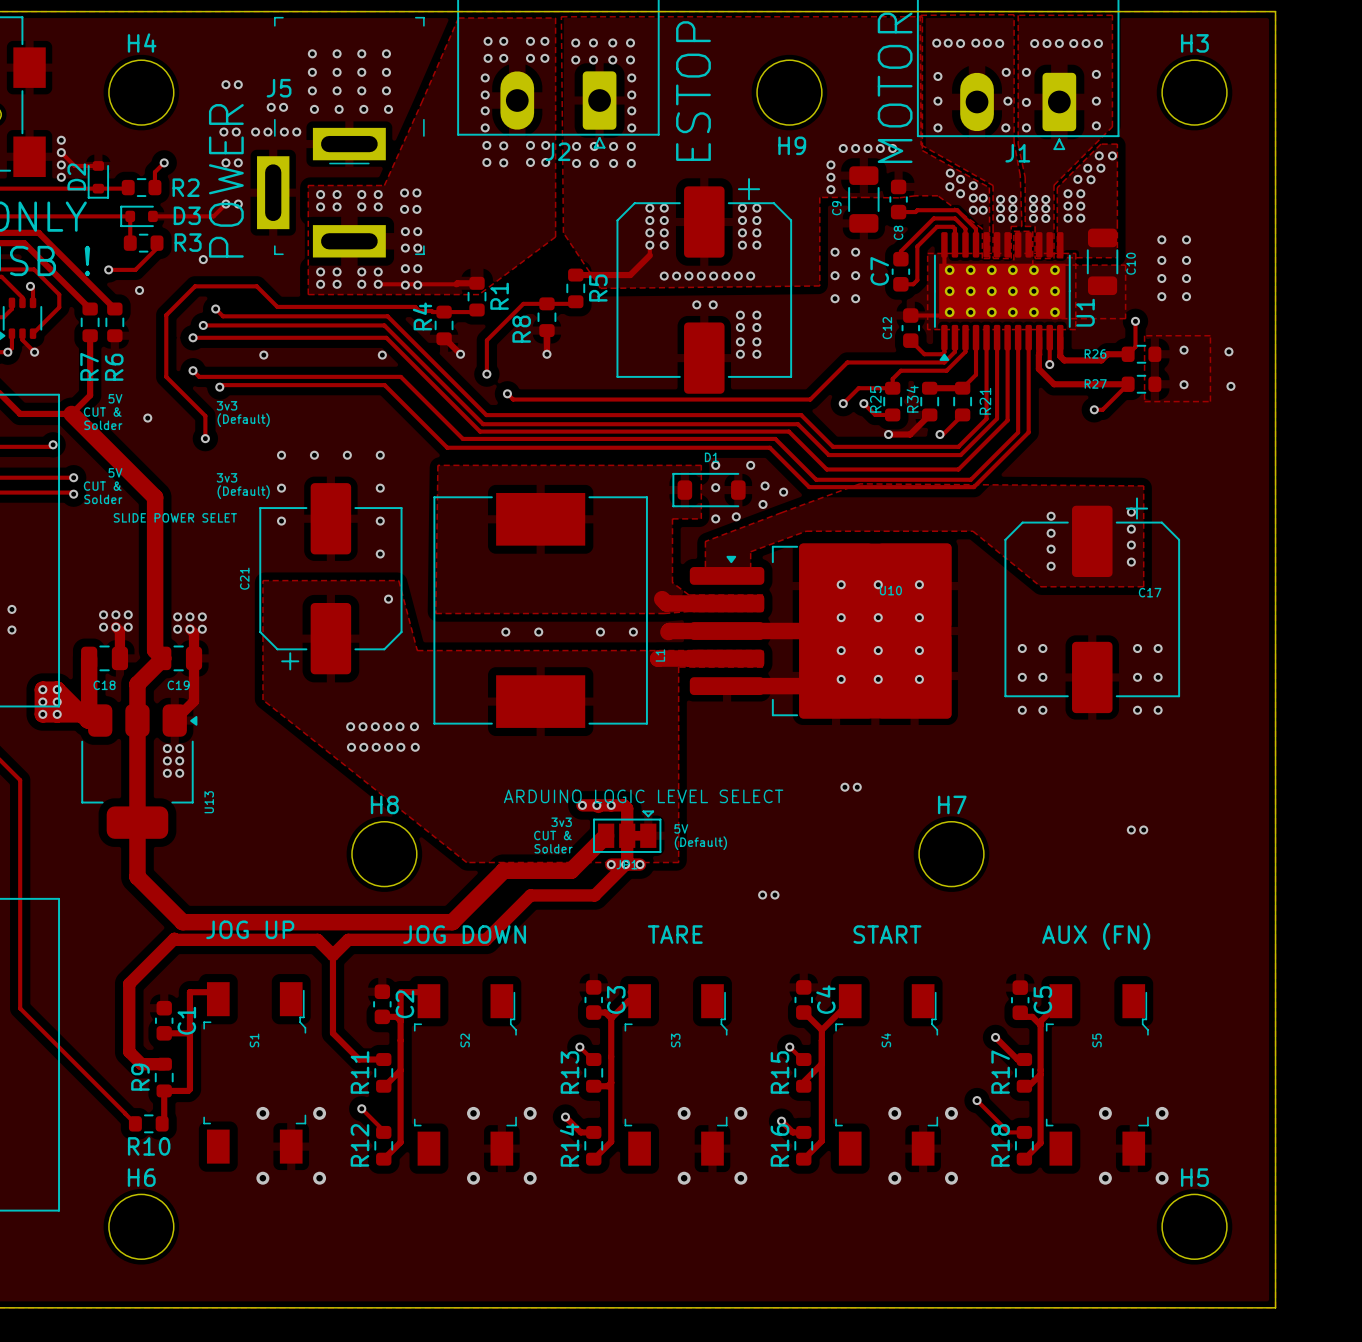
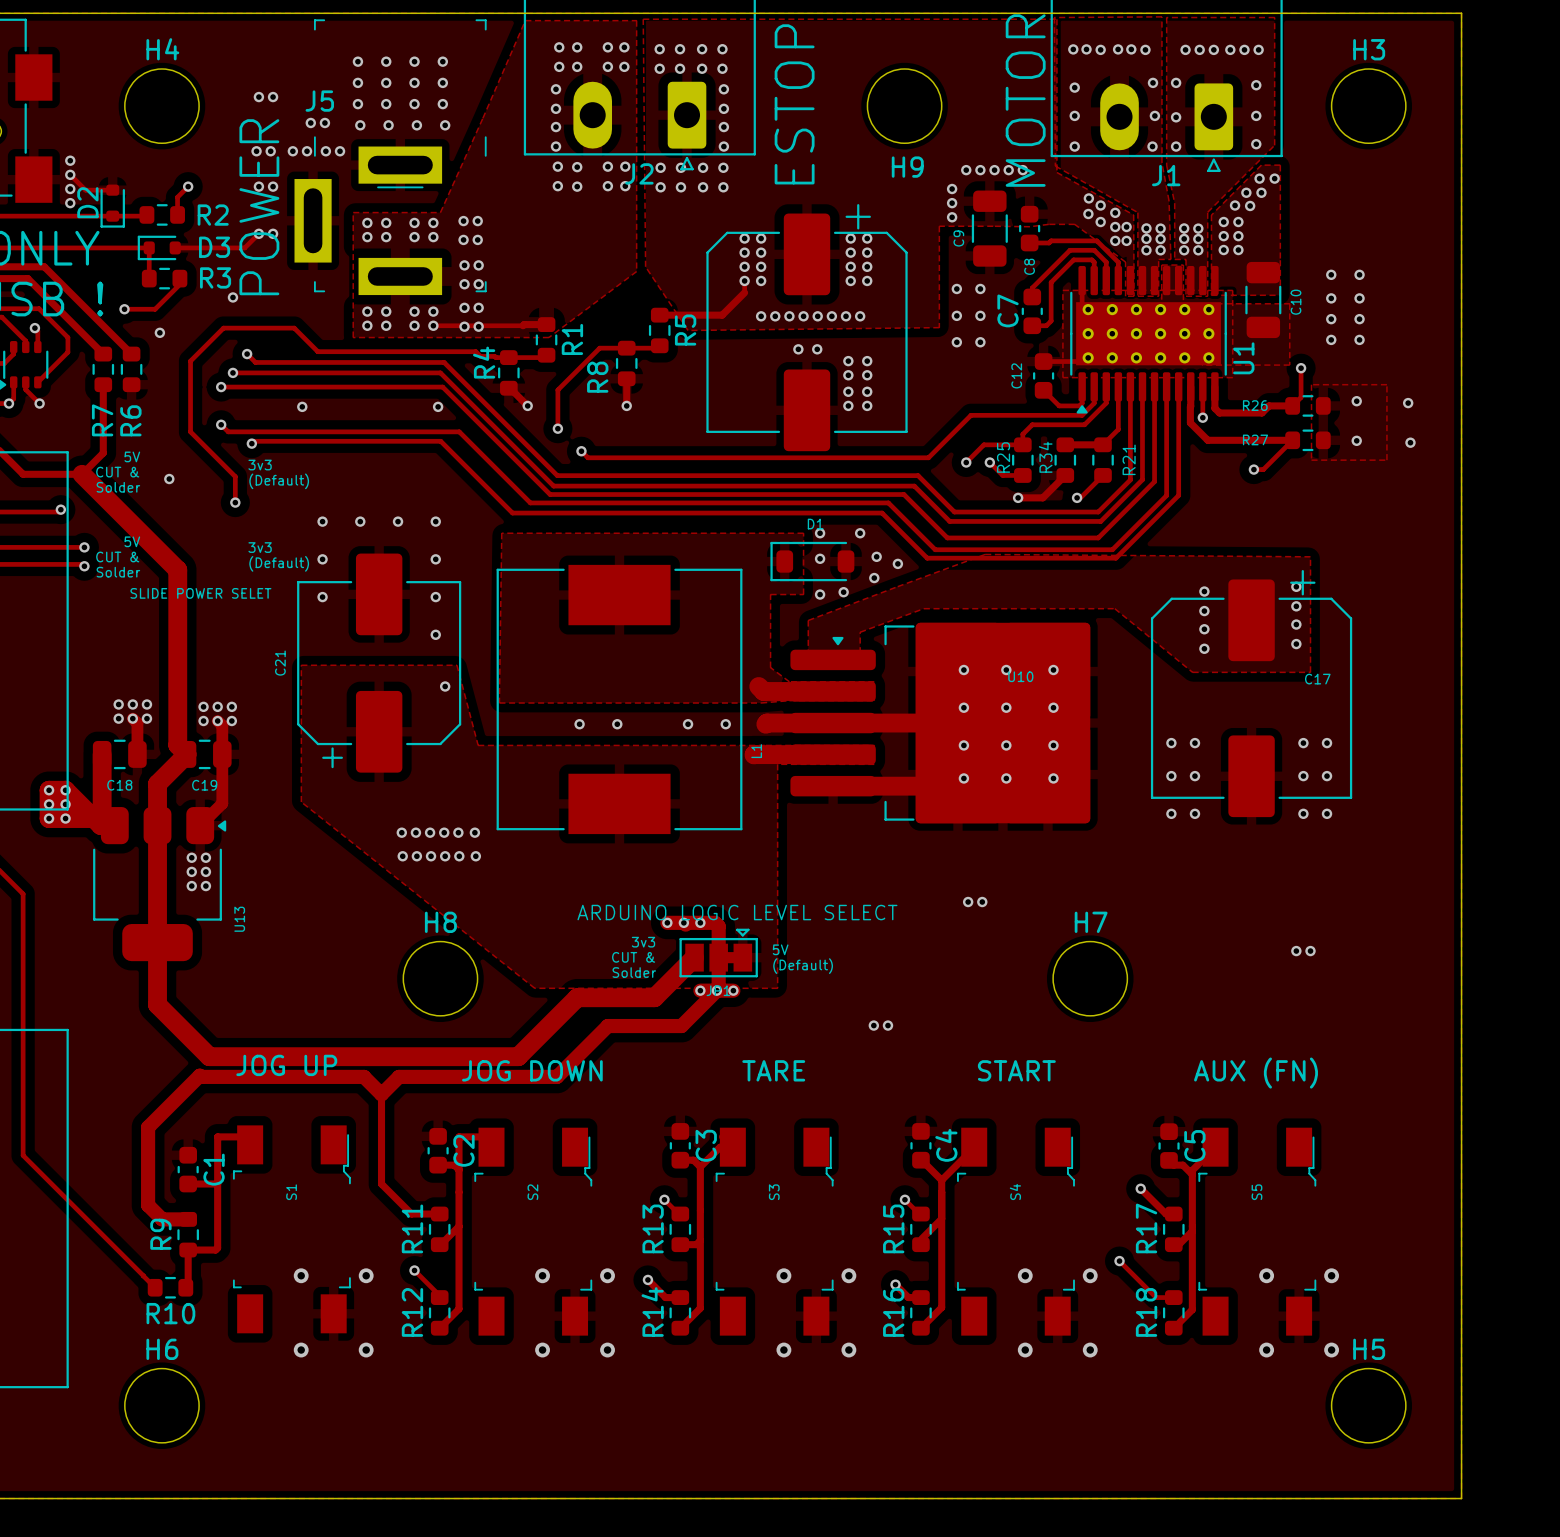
via: (11, 609) -> none
via: (11, 629) -> none

